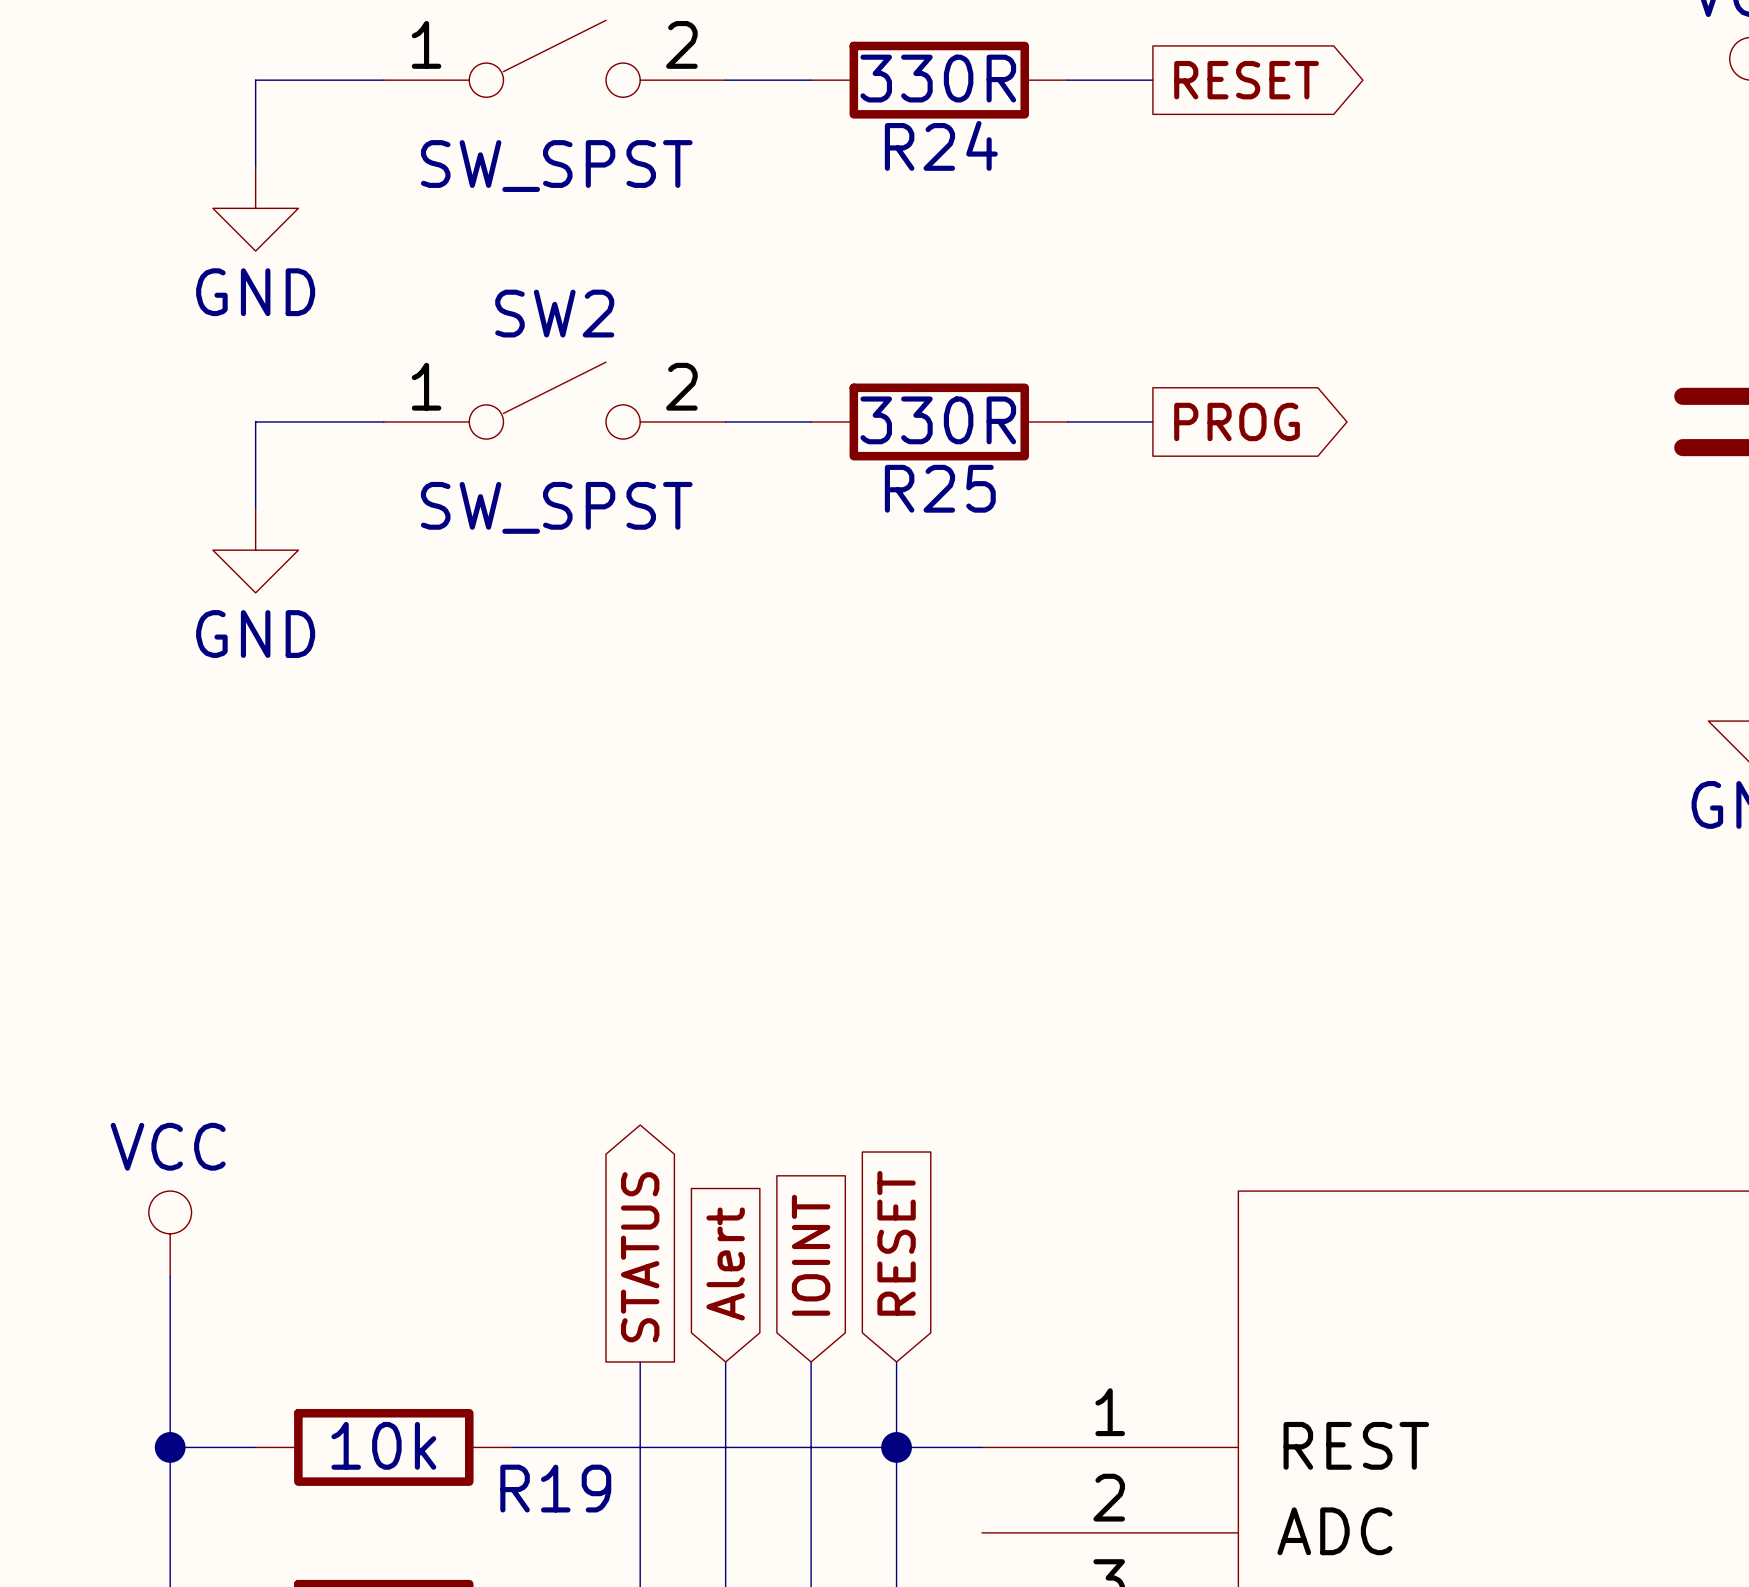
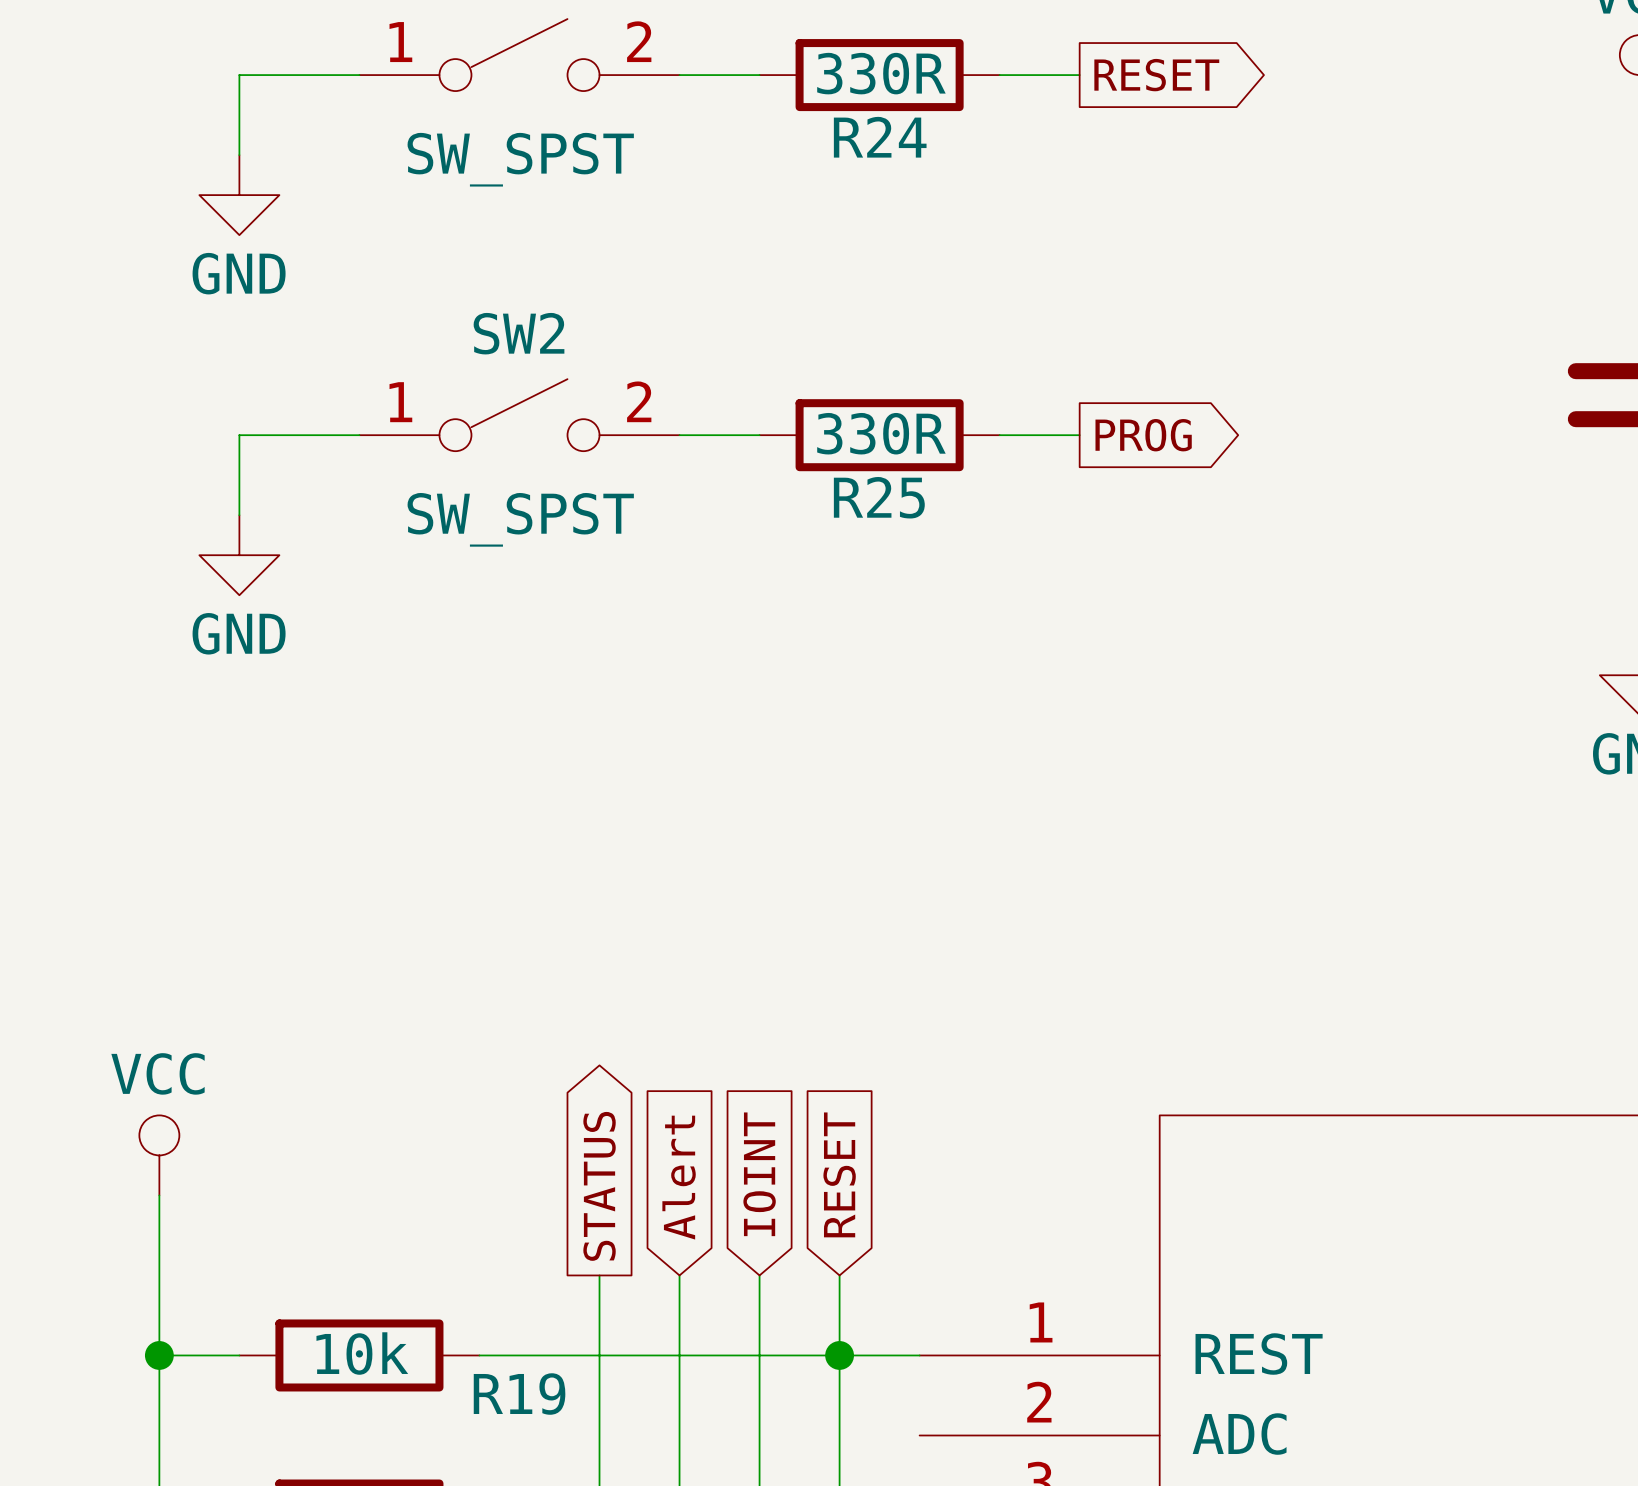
SW2 position: (554, 400) -> (519, 415)
wire: (383, 421) (255, 421) (255, 464) -> (359, 435) (239, 435)
wire: (725, 421) (811, 421) -> (679, 435) (759, 435)
R25 position: (939, 421) -> (879, 435)
wire: (1067, 421) (1152, 421) -> (999, 435) (1079, 435)
global label position: PROG (1237, 421) -> PROG (1143, 435)
power symbol position: GND (255, 550) -> GND (239, 555)

